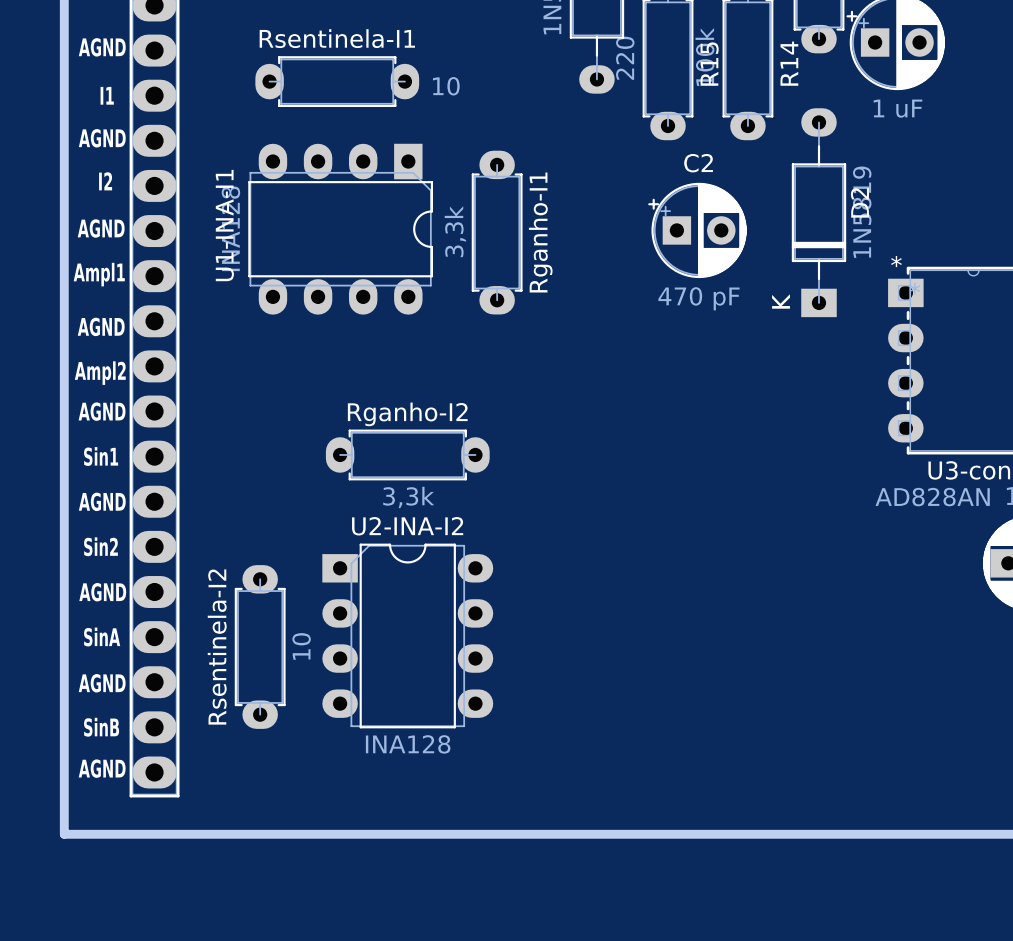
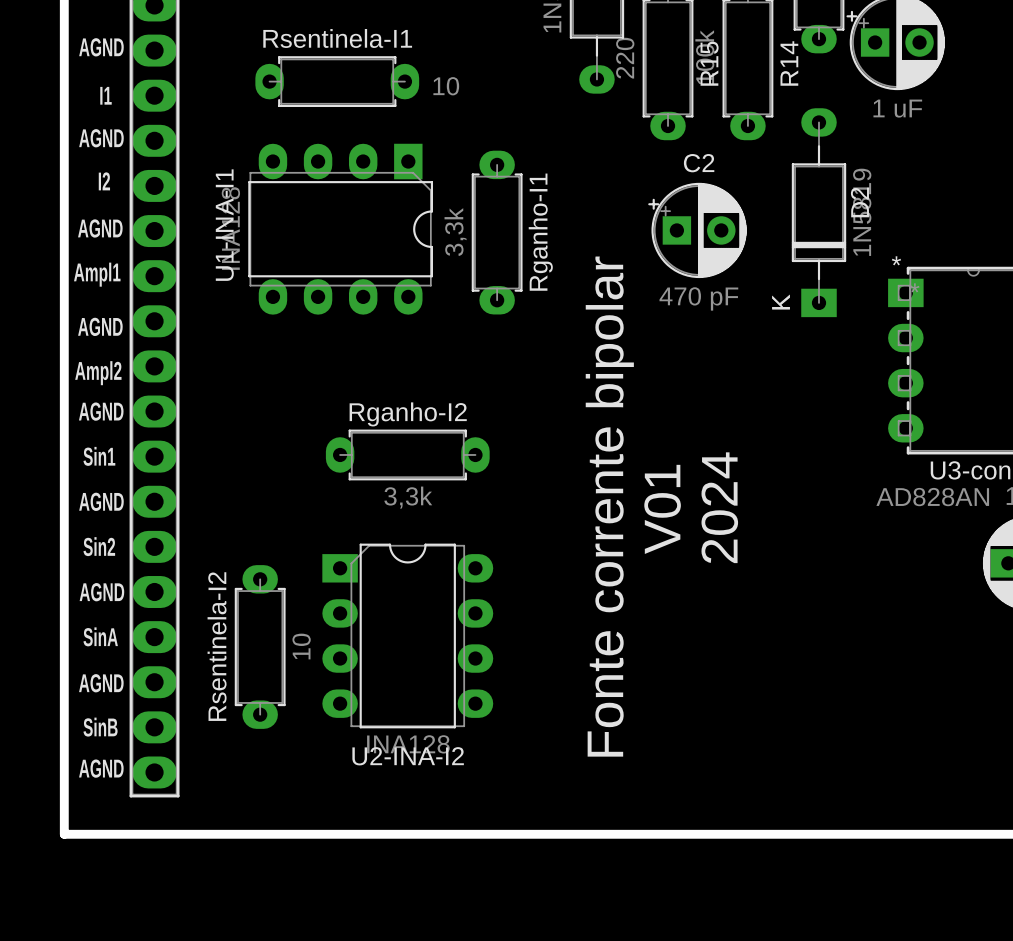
text: none -> Fonte corrente bipolar (609, 506)
text: none -> 2024 (719, 507)
text: none -> V01 (662, 509)
U2-INA-I2 name position: U2-INA-I2 (407, 526) -> U2-INA-I2 (408, 756)

